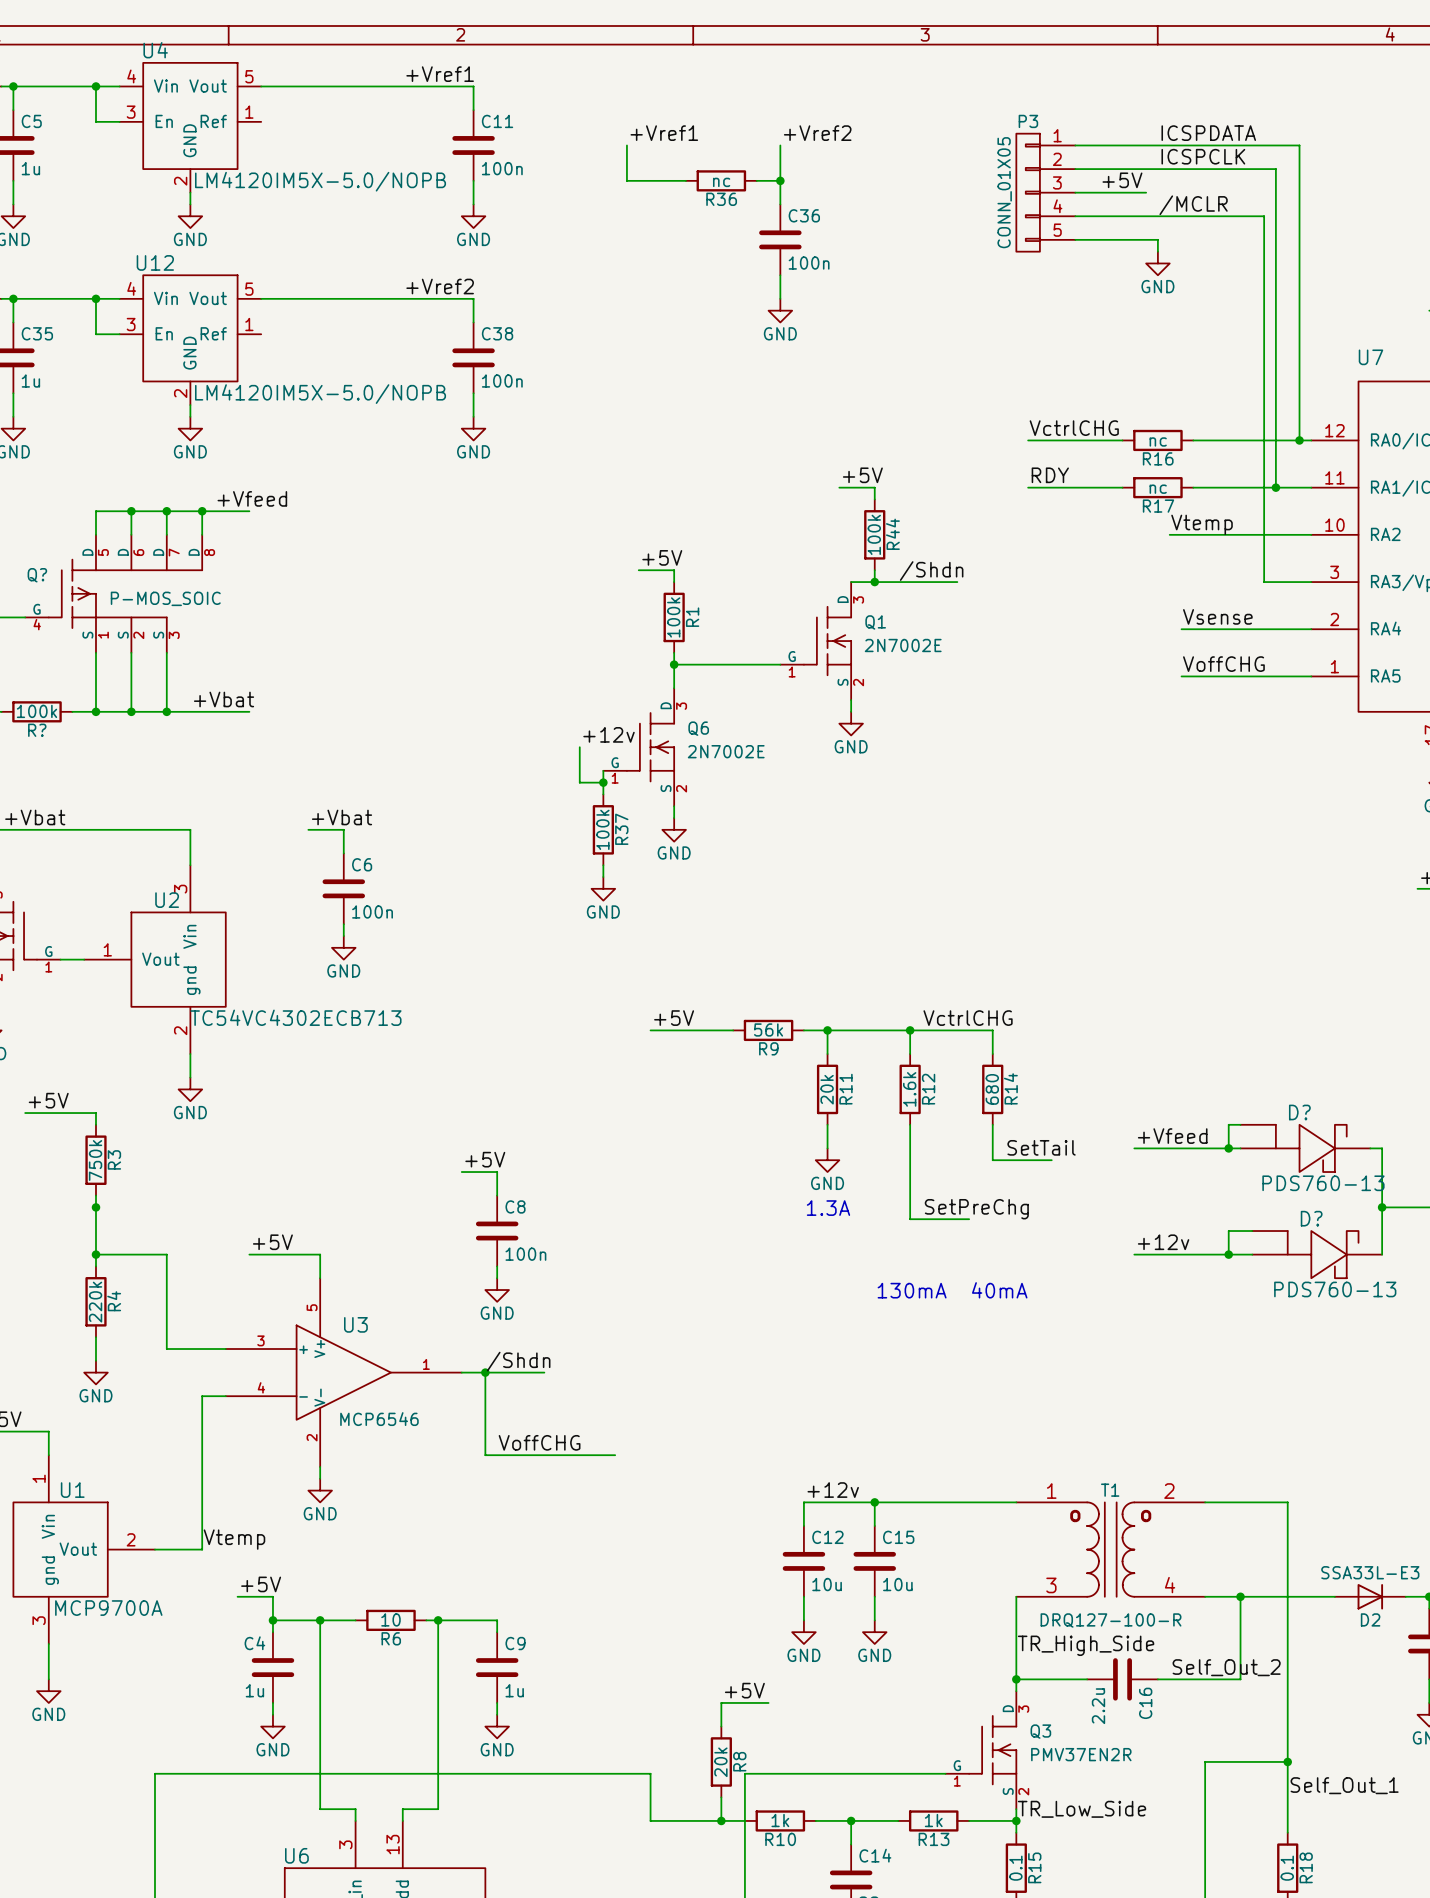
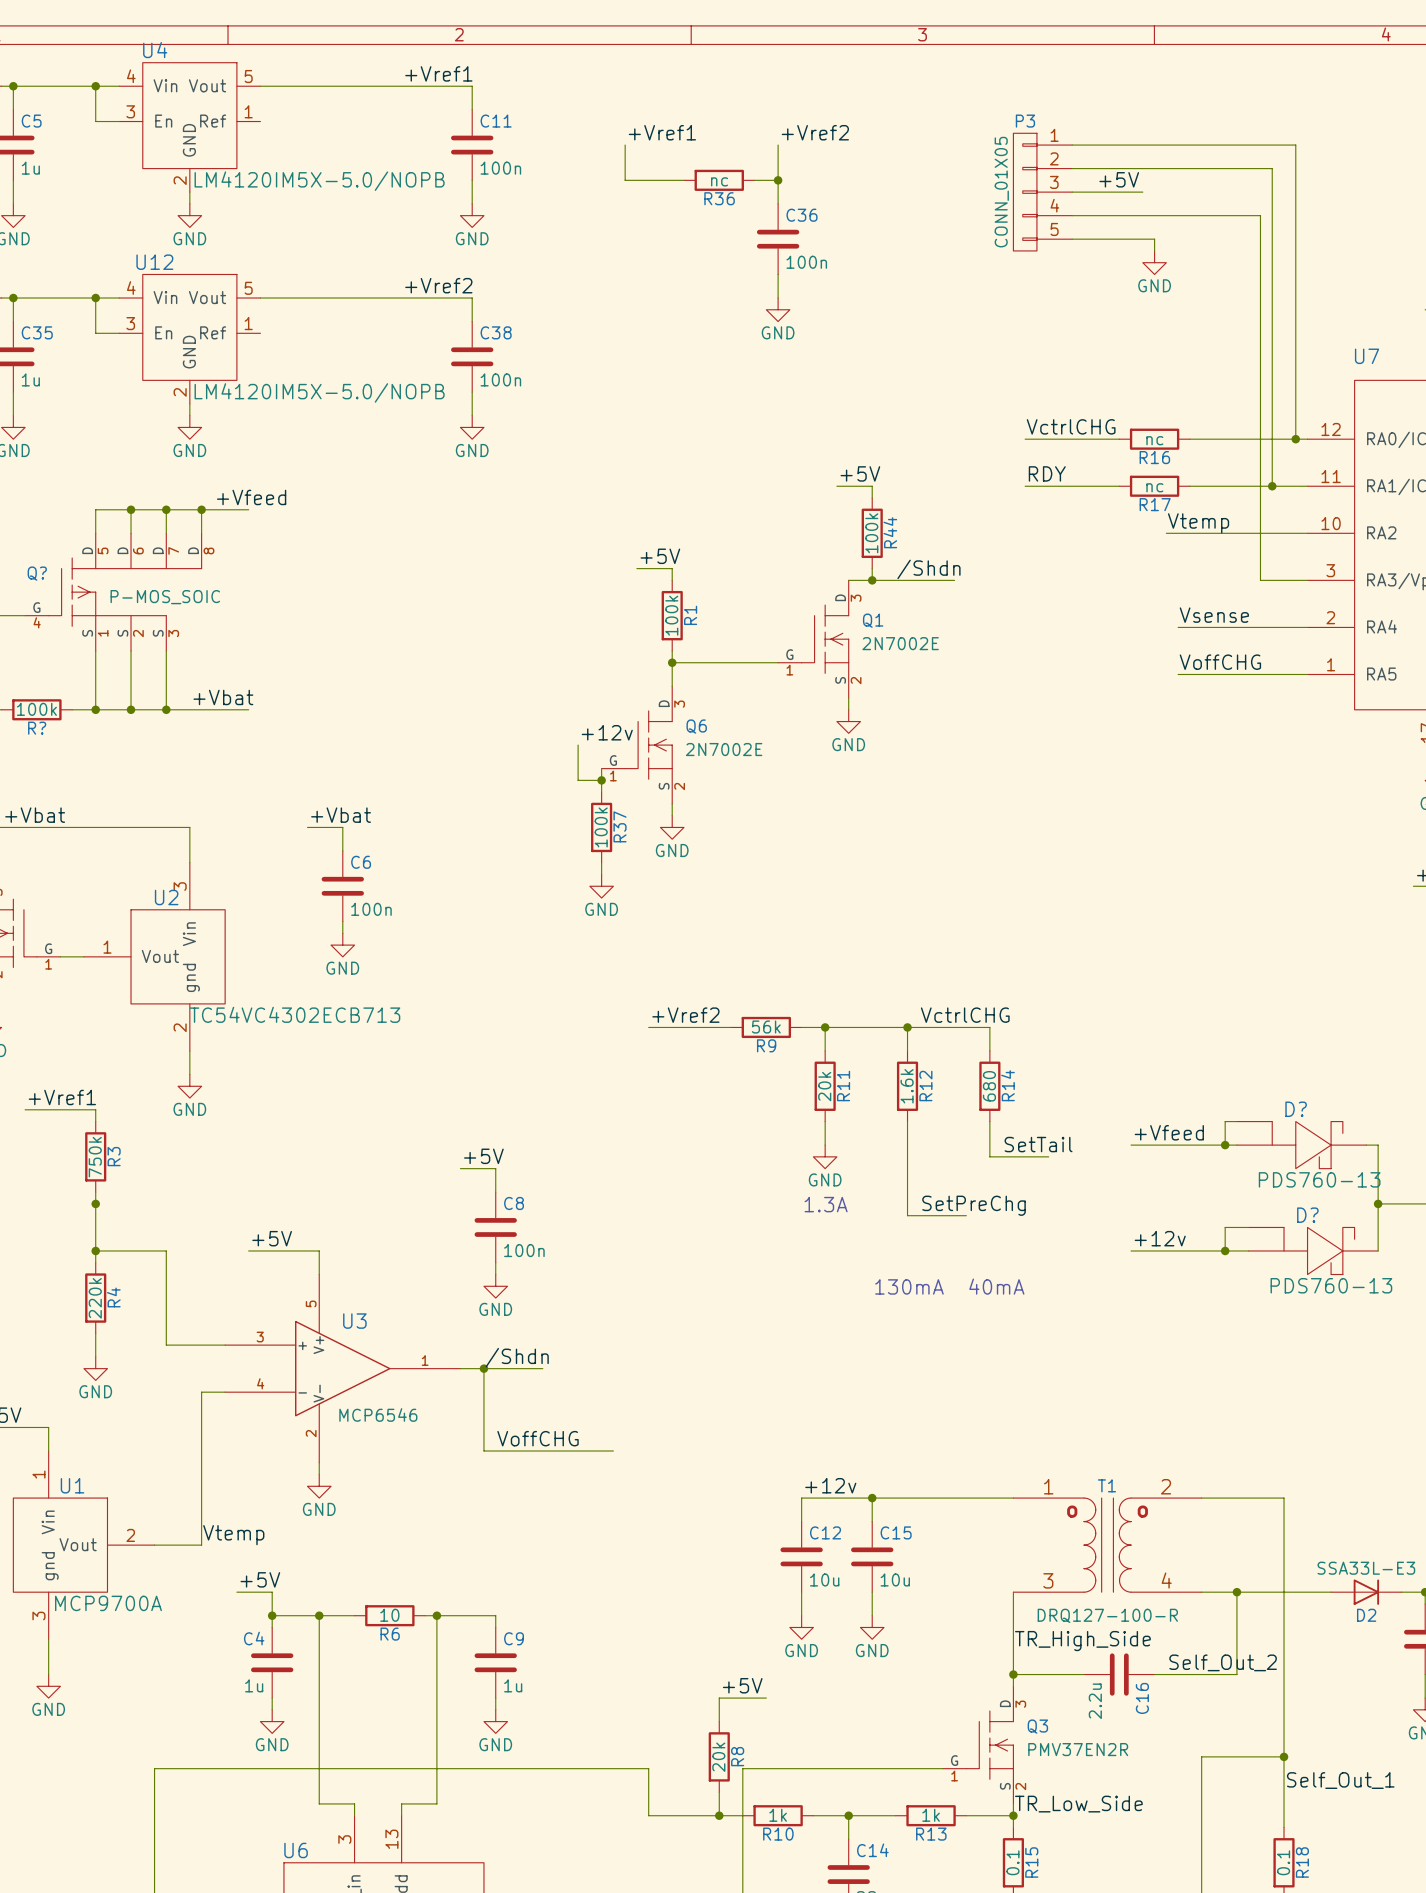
label: ICSPDATA (1208, 133) -> none
label: ICSPCLK (1203, 156) -> none
label: /MCLR (1193, 205) -> none
label: +5V (674, 1018) -> +Vref2 (685, 1015)
label: +5V (48, 1100) -> +Vref1 (62, 1097)

